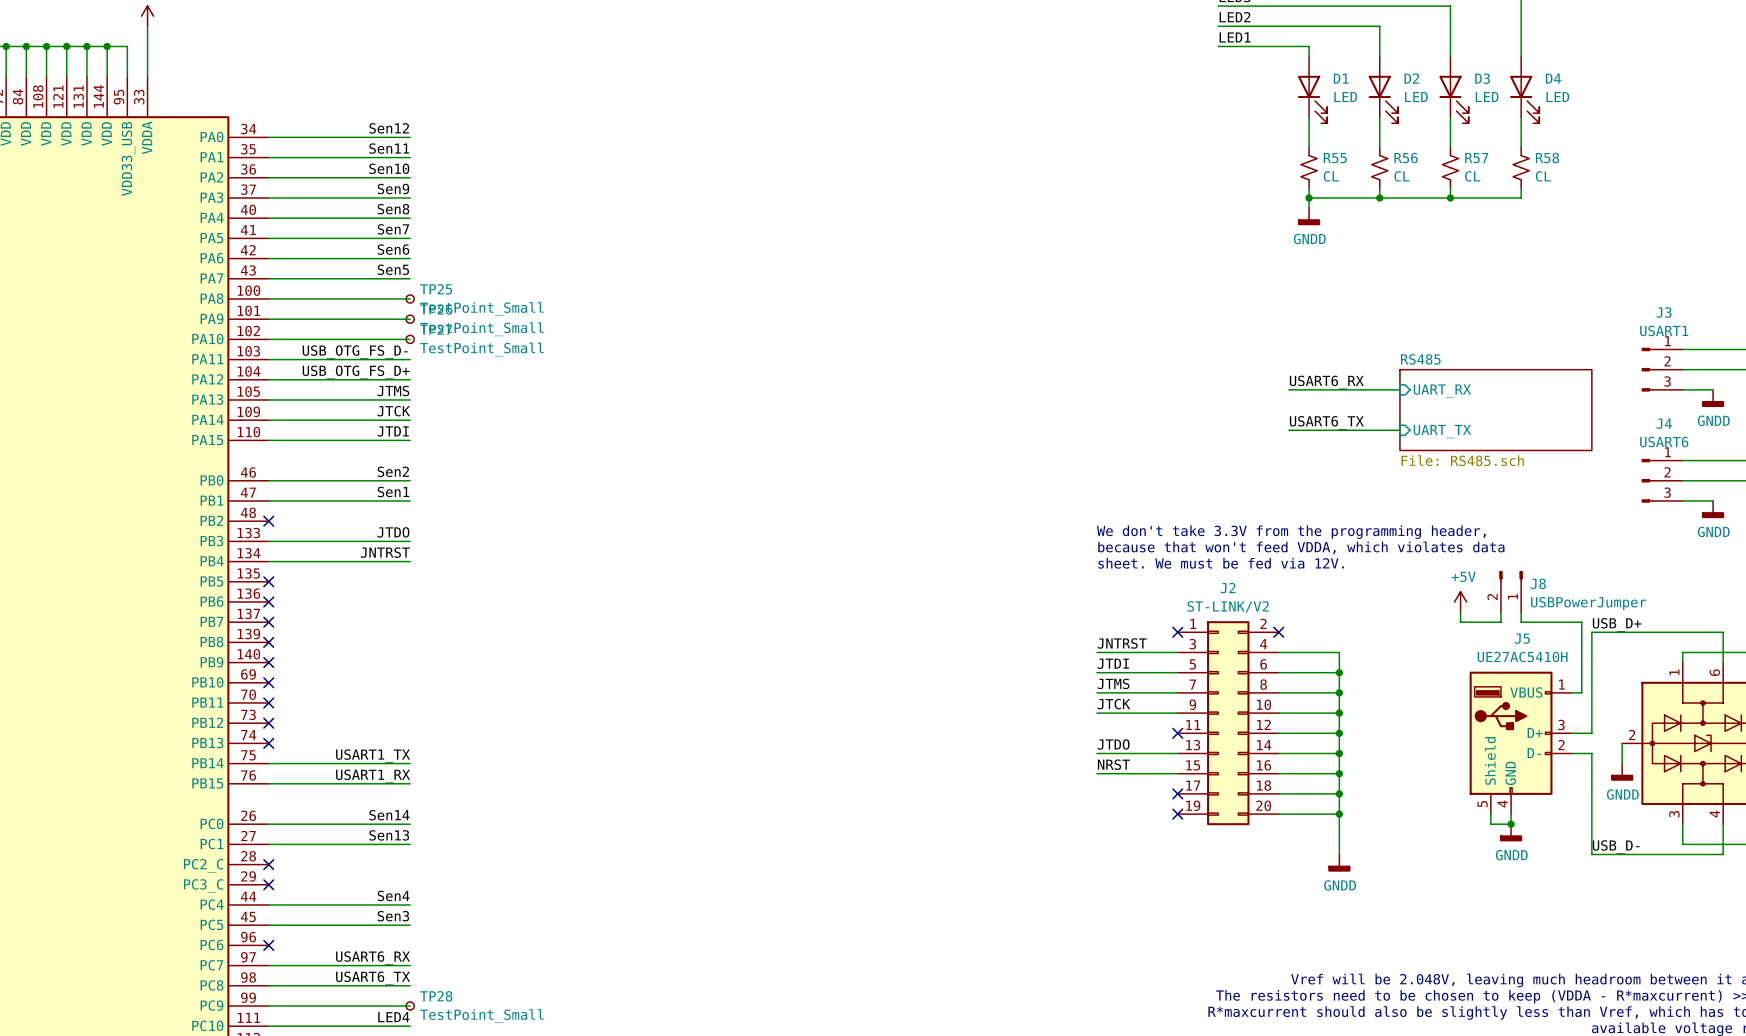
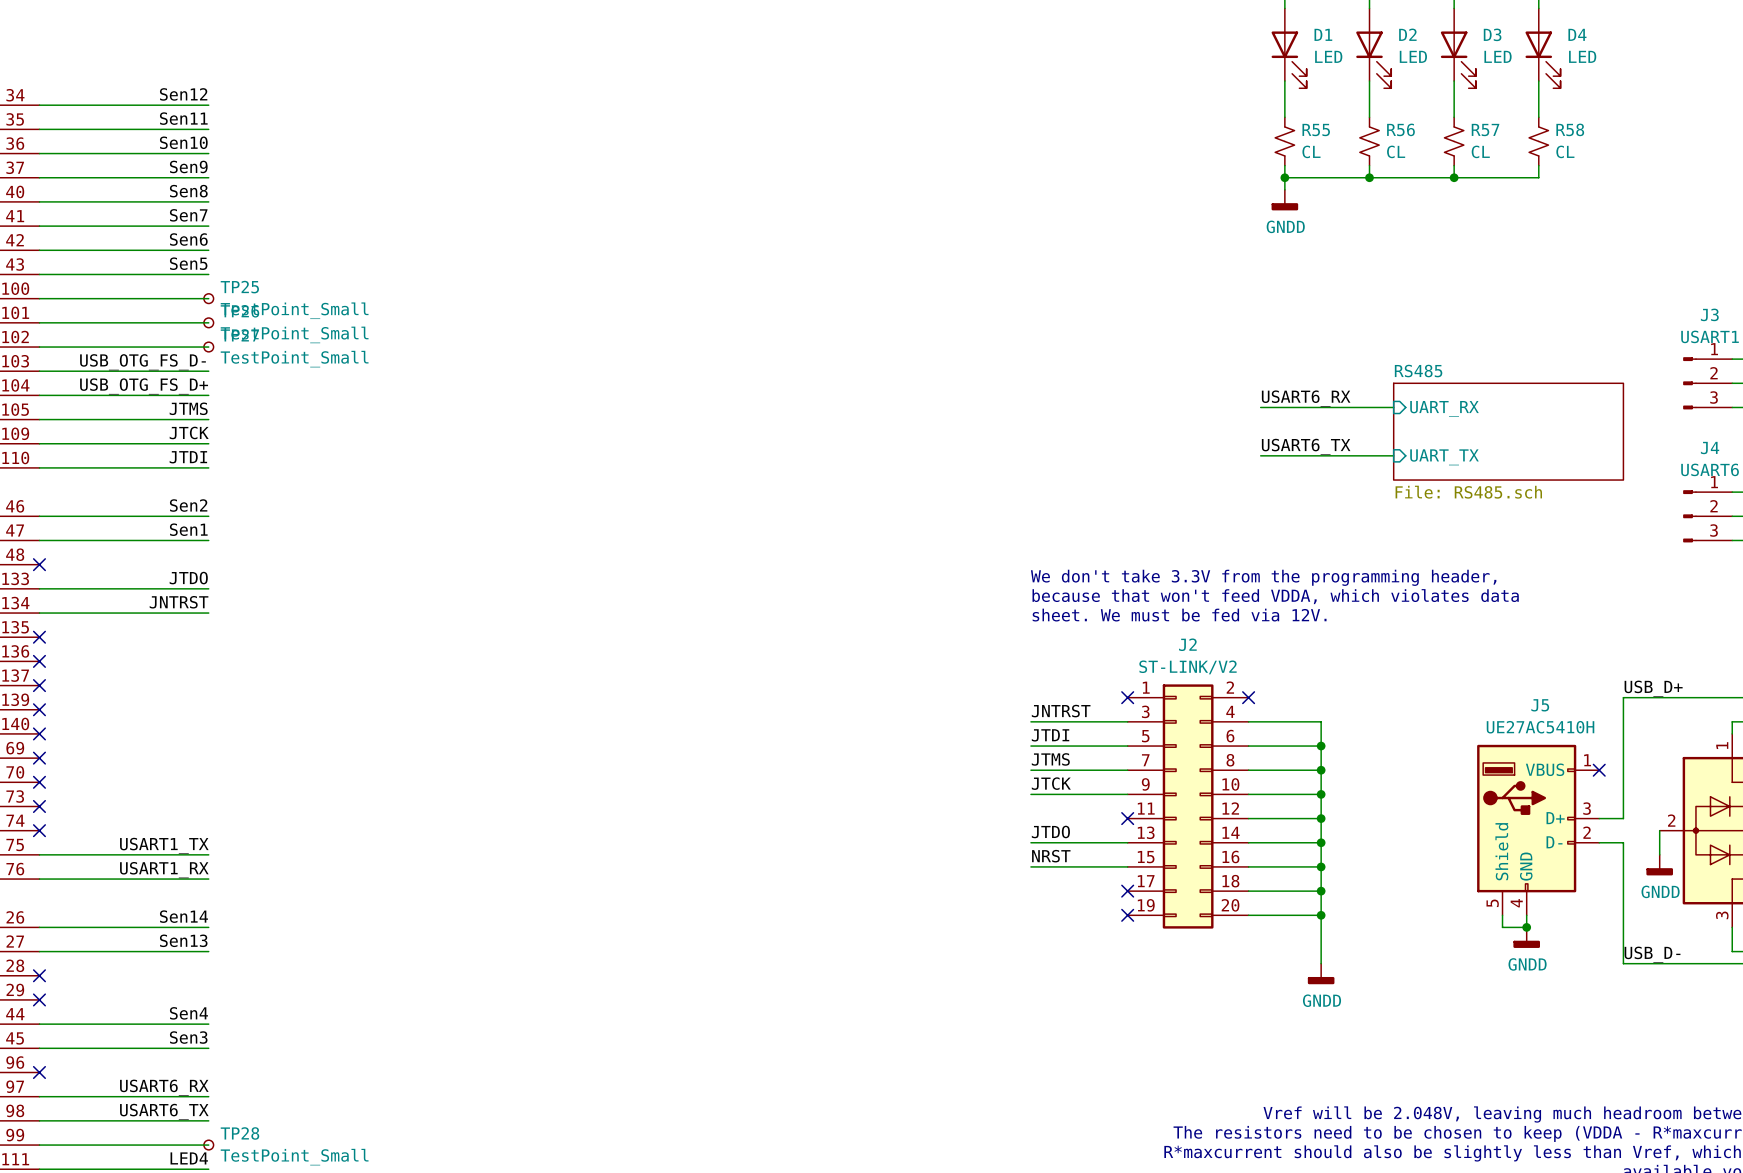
J8: USBPowerJumper (1511, 591) -> none
power symbol: +5V (1460, 601) -> none
wire: (1460, 612) (1460, 622) (1500, 622) (1500, 612) -> none
wire: (1521, 612) (1521, 622) (1581, 622) (1581, 692) (1571, 692) -> none
no-connect mark: none -> (1599, 770)

